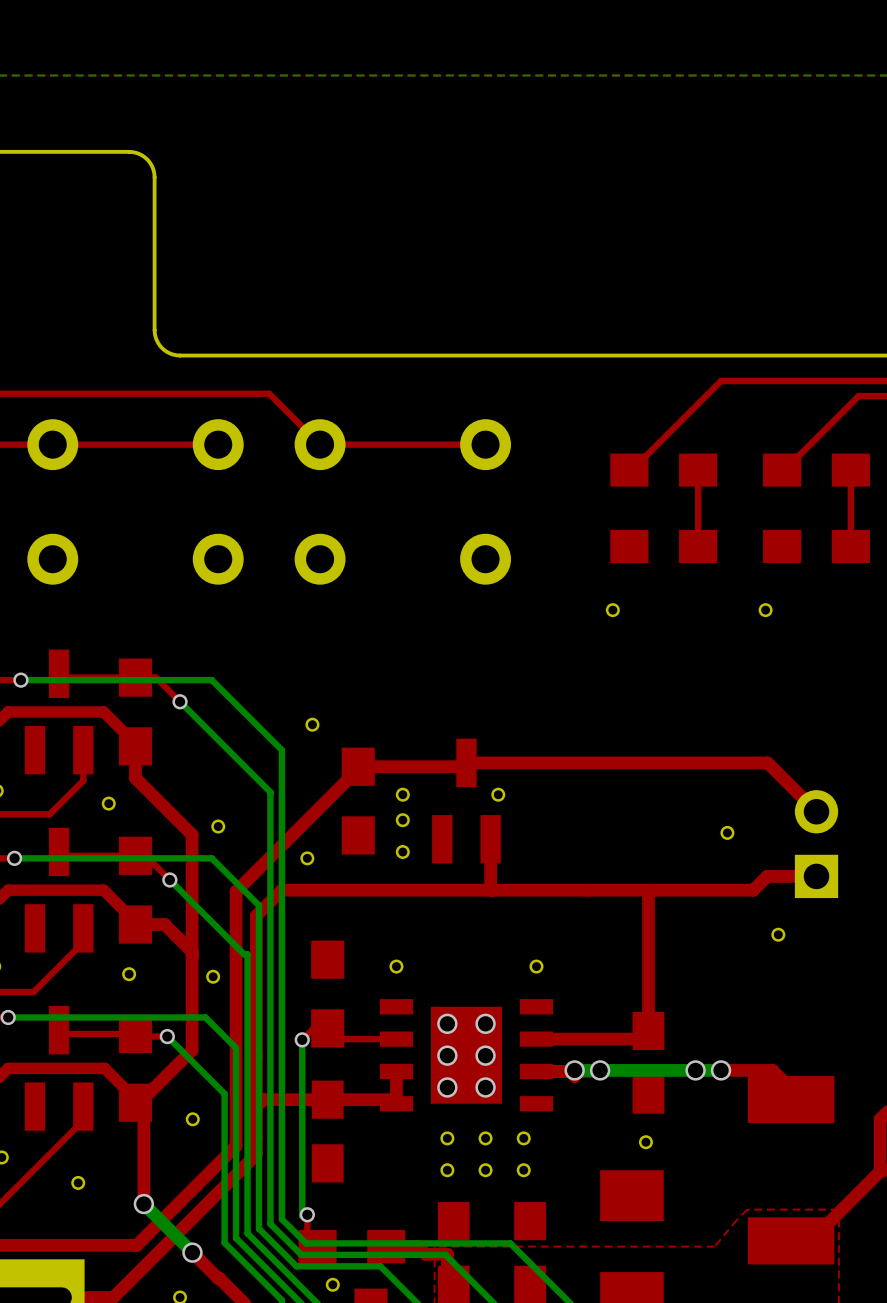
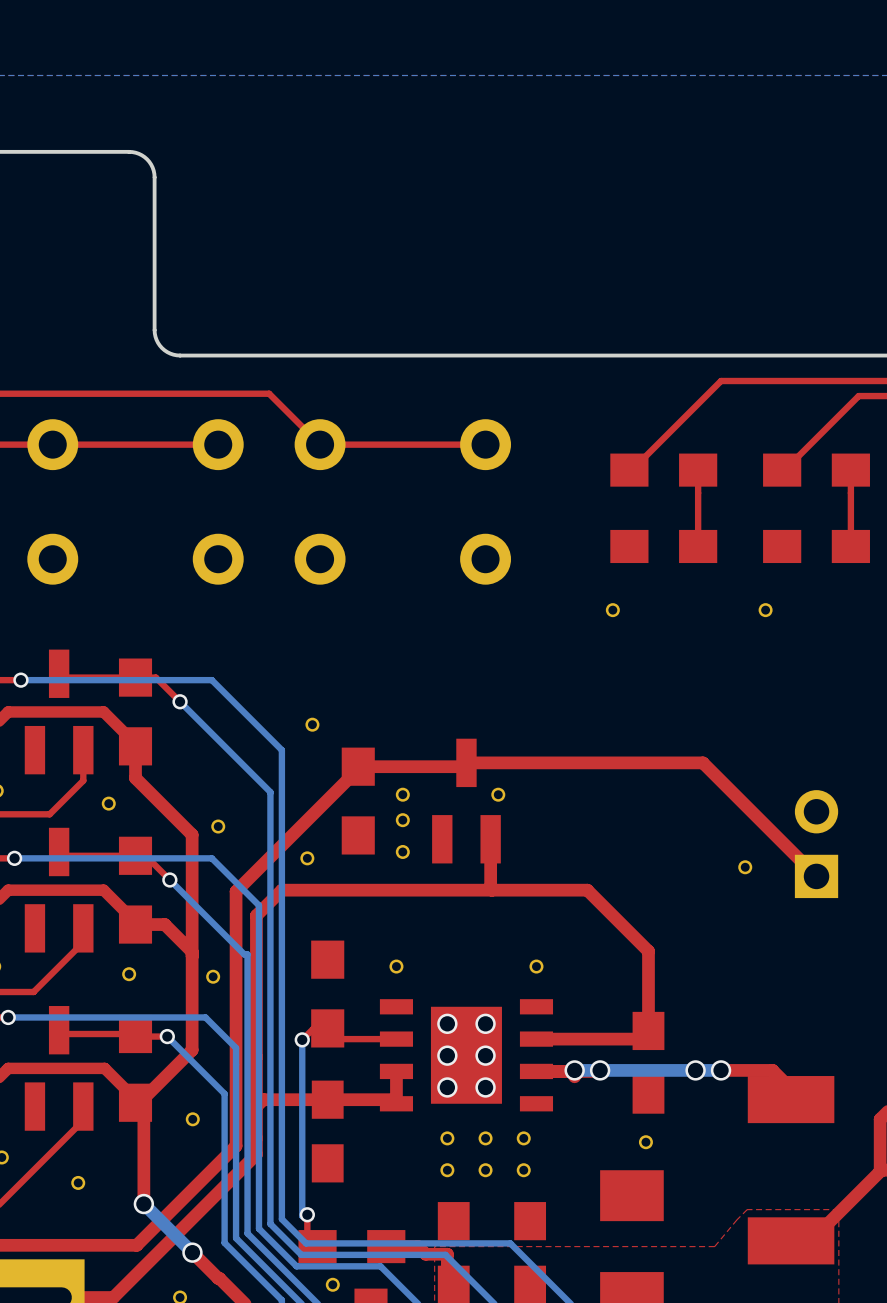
top track: (702, 762) (767, 762) (816, 811) -> (702, 762) (816, 876)
part: (727, 832) -> none
part: none -> (745, 867)
top track: (816, 876) (767, 876) (753, 890) (587, 890) -> none
top track: (651, 890) (648, 892) (648, 951) -> (587, 890) (648, 951)
part: (778, 934) -> none

